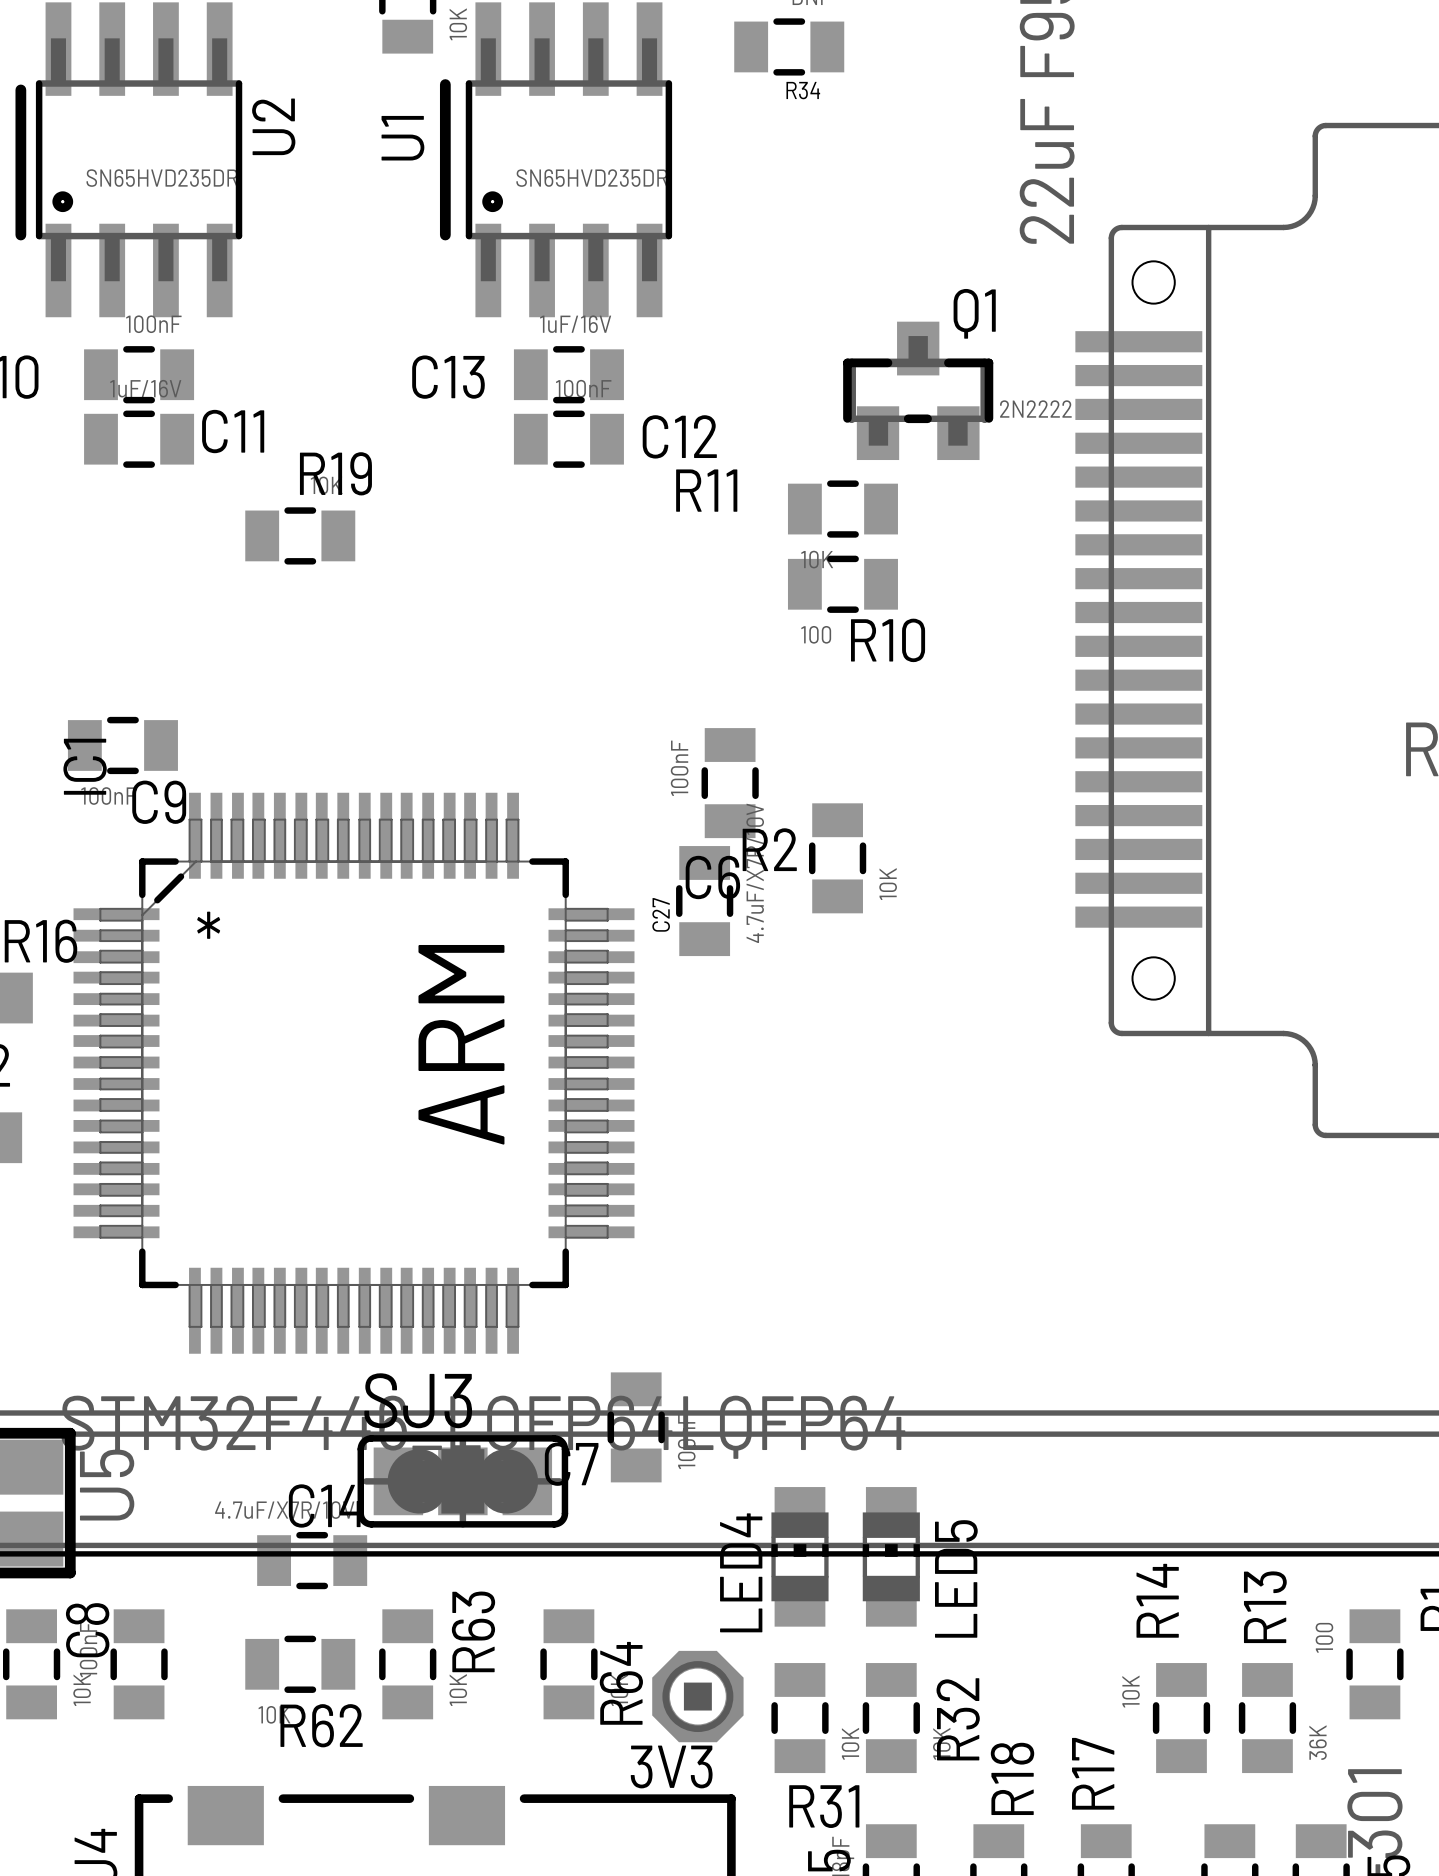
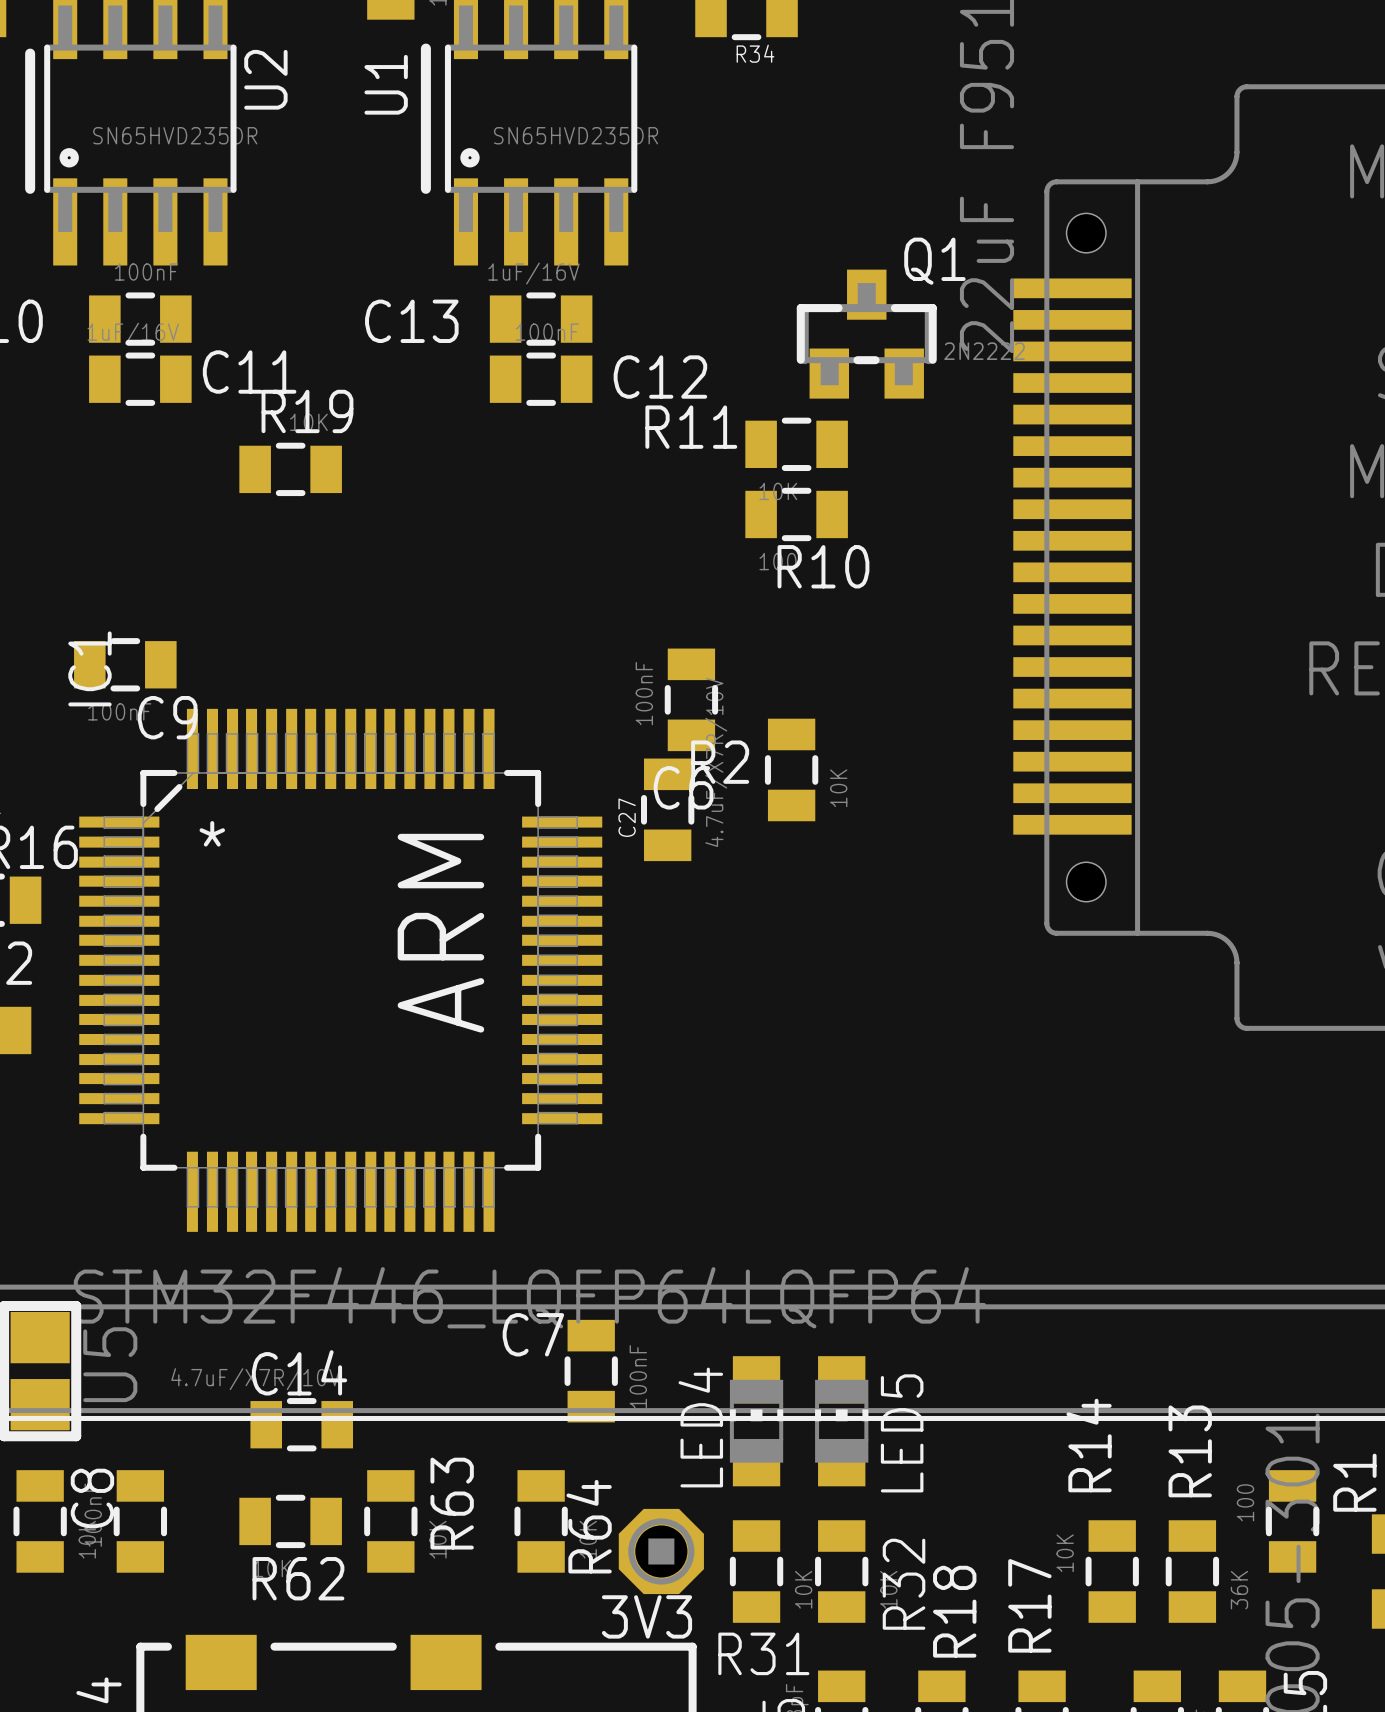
C7 position: (636, 1427) -> (591, 1371)
SJ3: (462, 1481) -> none

